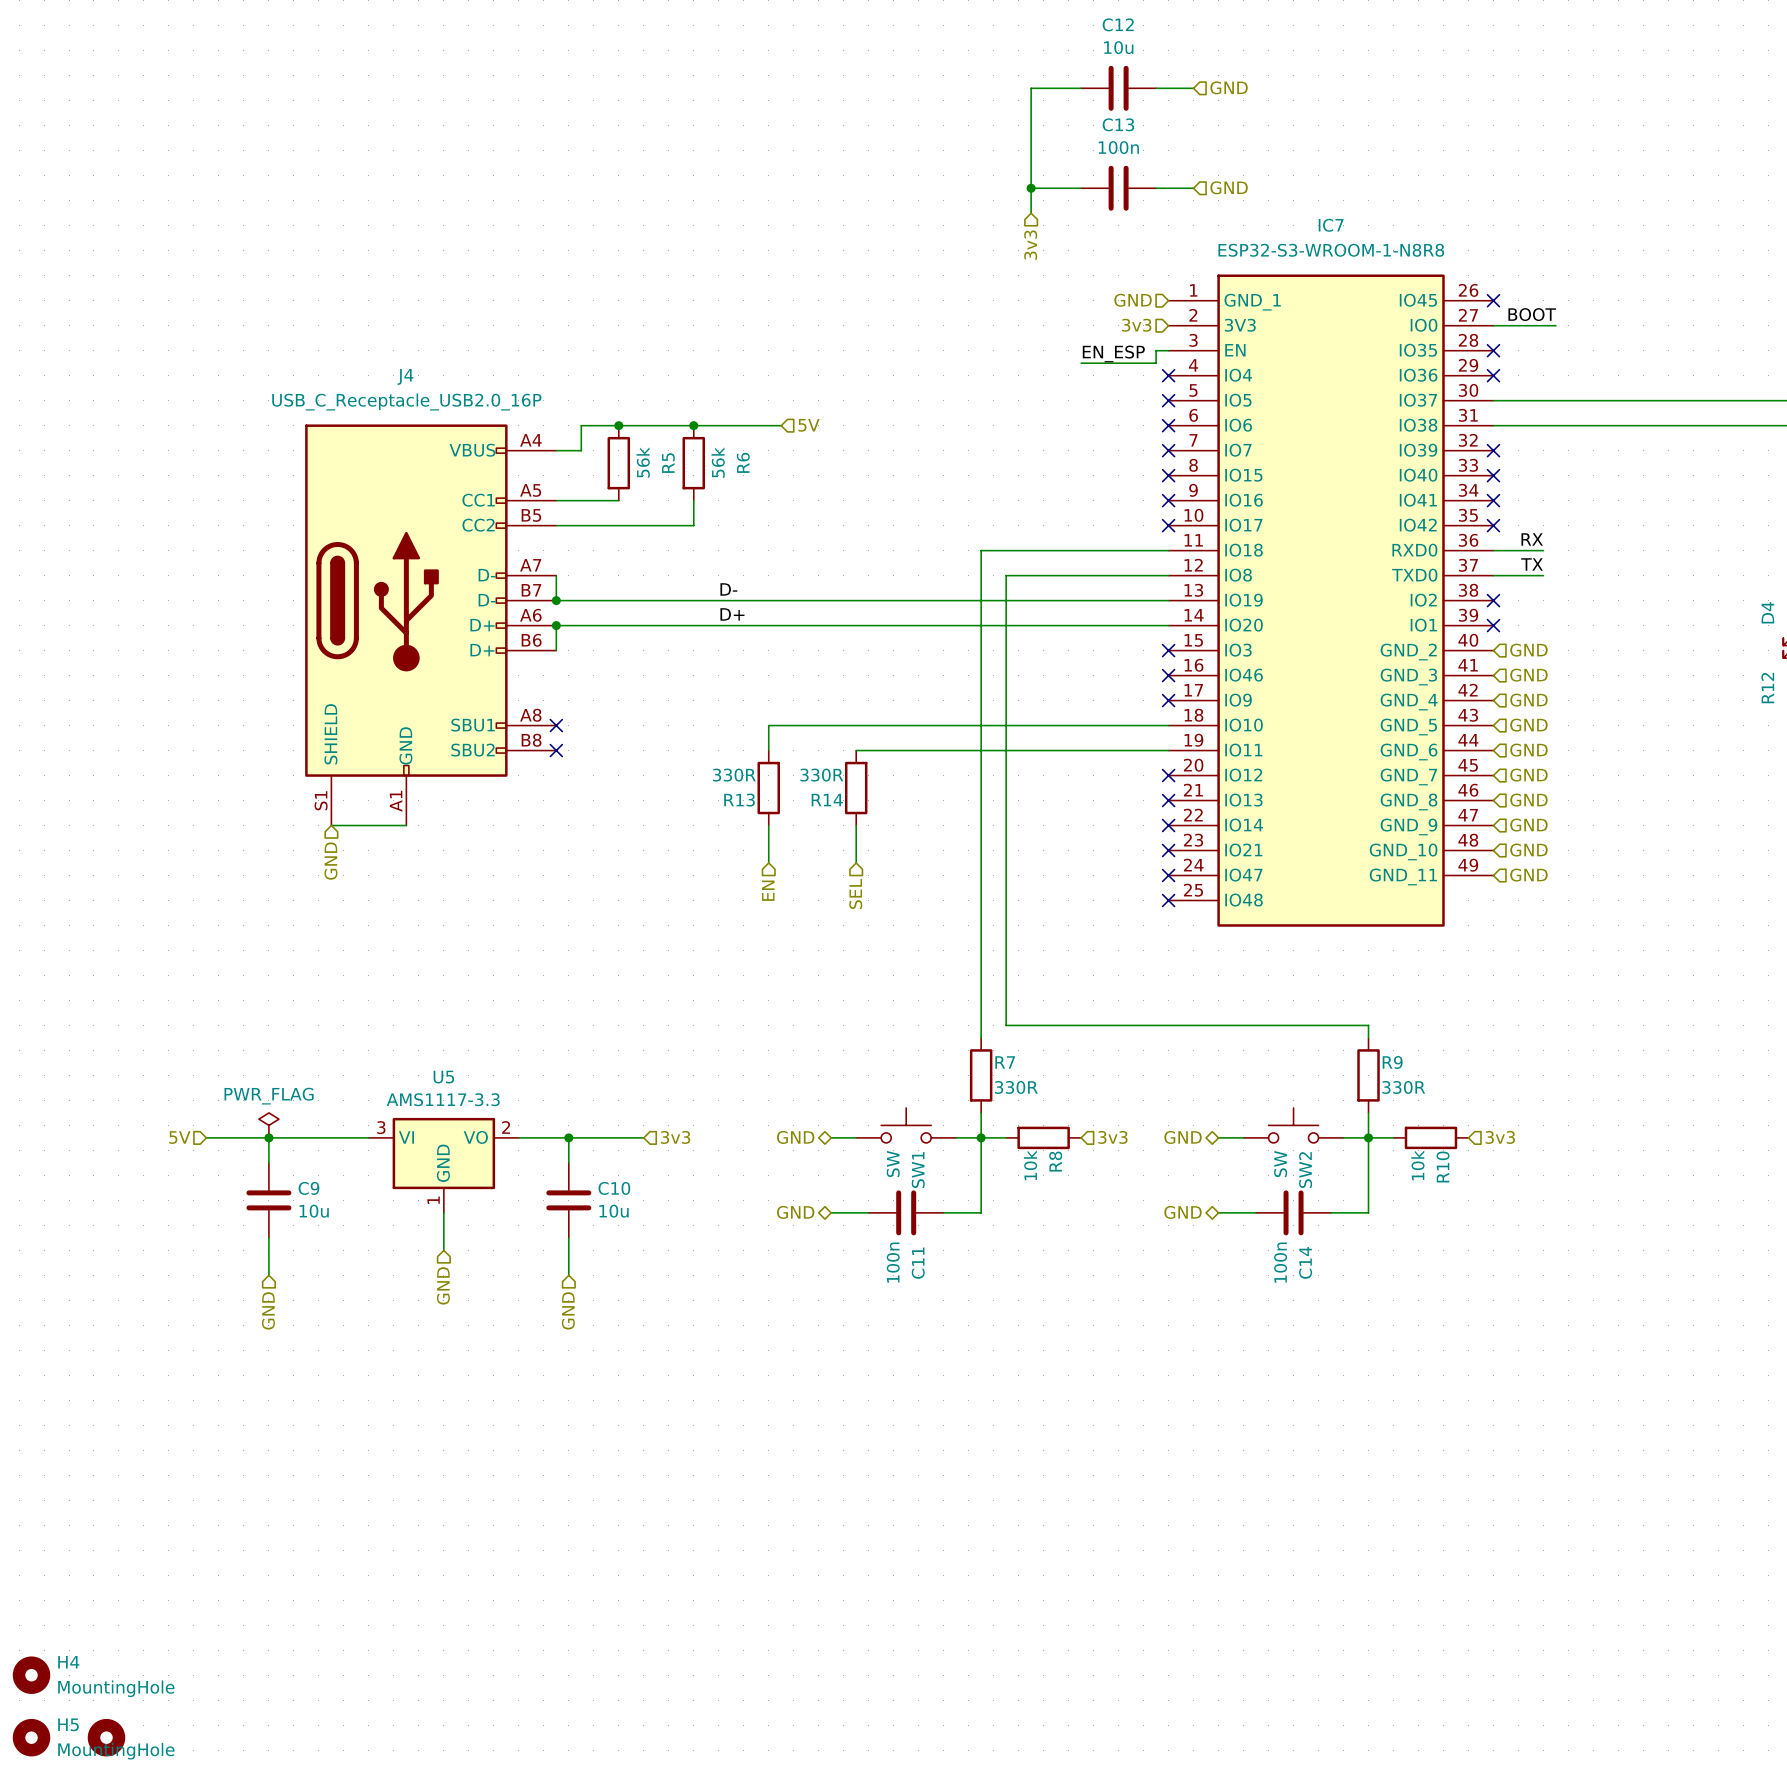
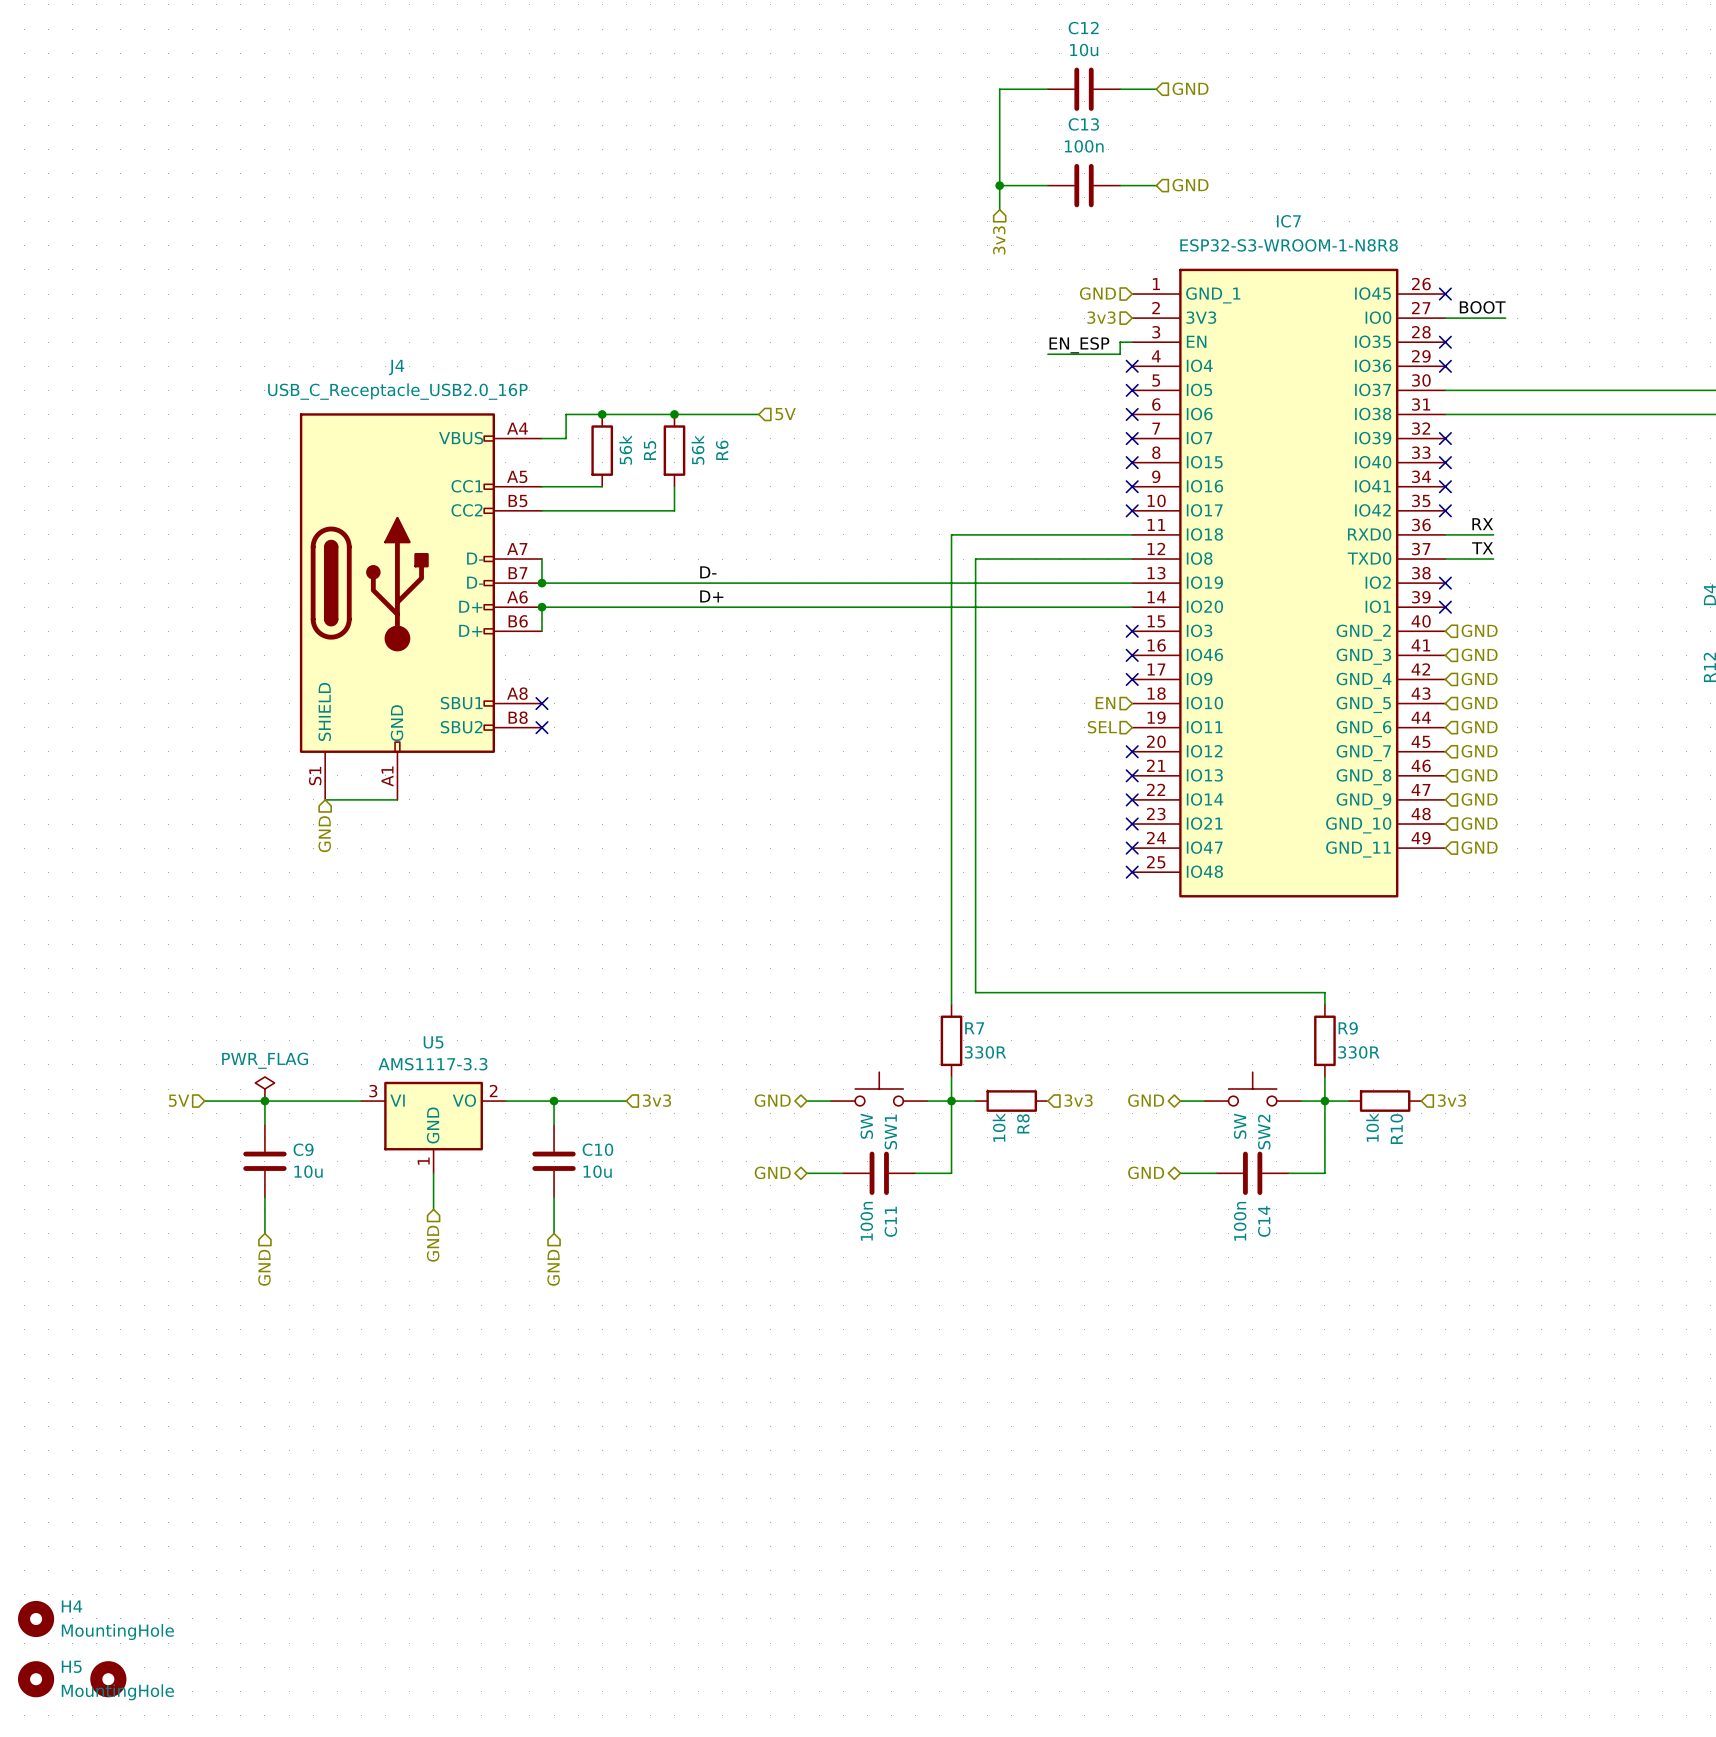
hierarchical label: none -> EN (1105, 703)
wire: (1168, 725) (768, 725) (768, 750) -> none
wire: (856, 750) (1168, 750) -> none
hierarchical label: none -> SEL (1102, 727)
R13: 330R (768, 788) -> none
R14: 330R (856, 788) -> none
wire: (768, 825) (768, 863) -> none
wire: (856, 825) (856, 863) -> none
hierarchical label: EN (768, 890) -> none
hierarchical label: SEL (855, 893) -> none

